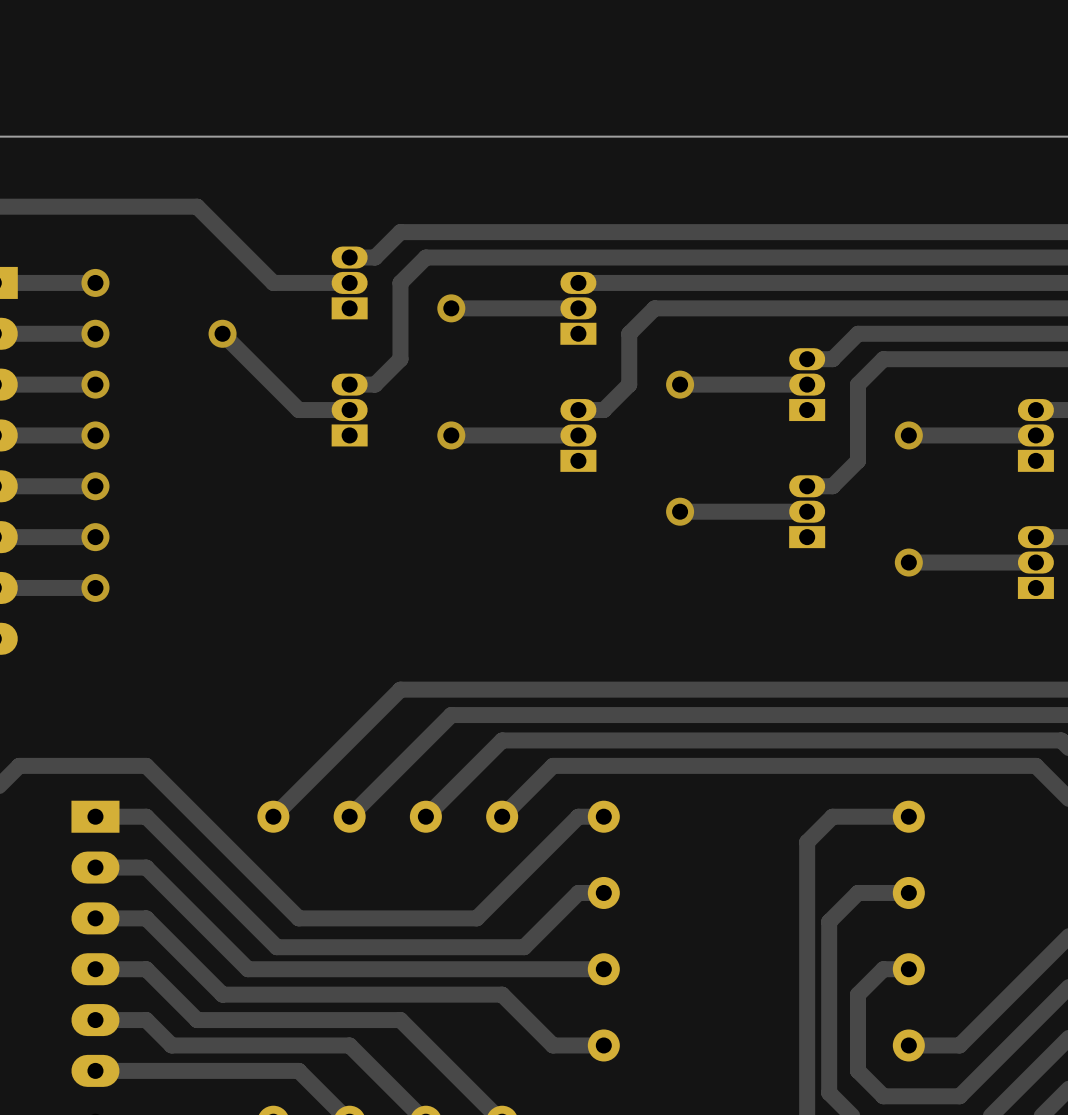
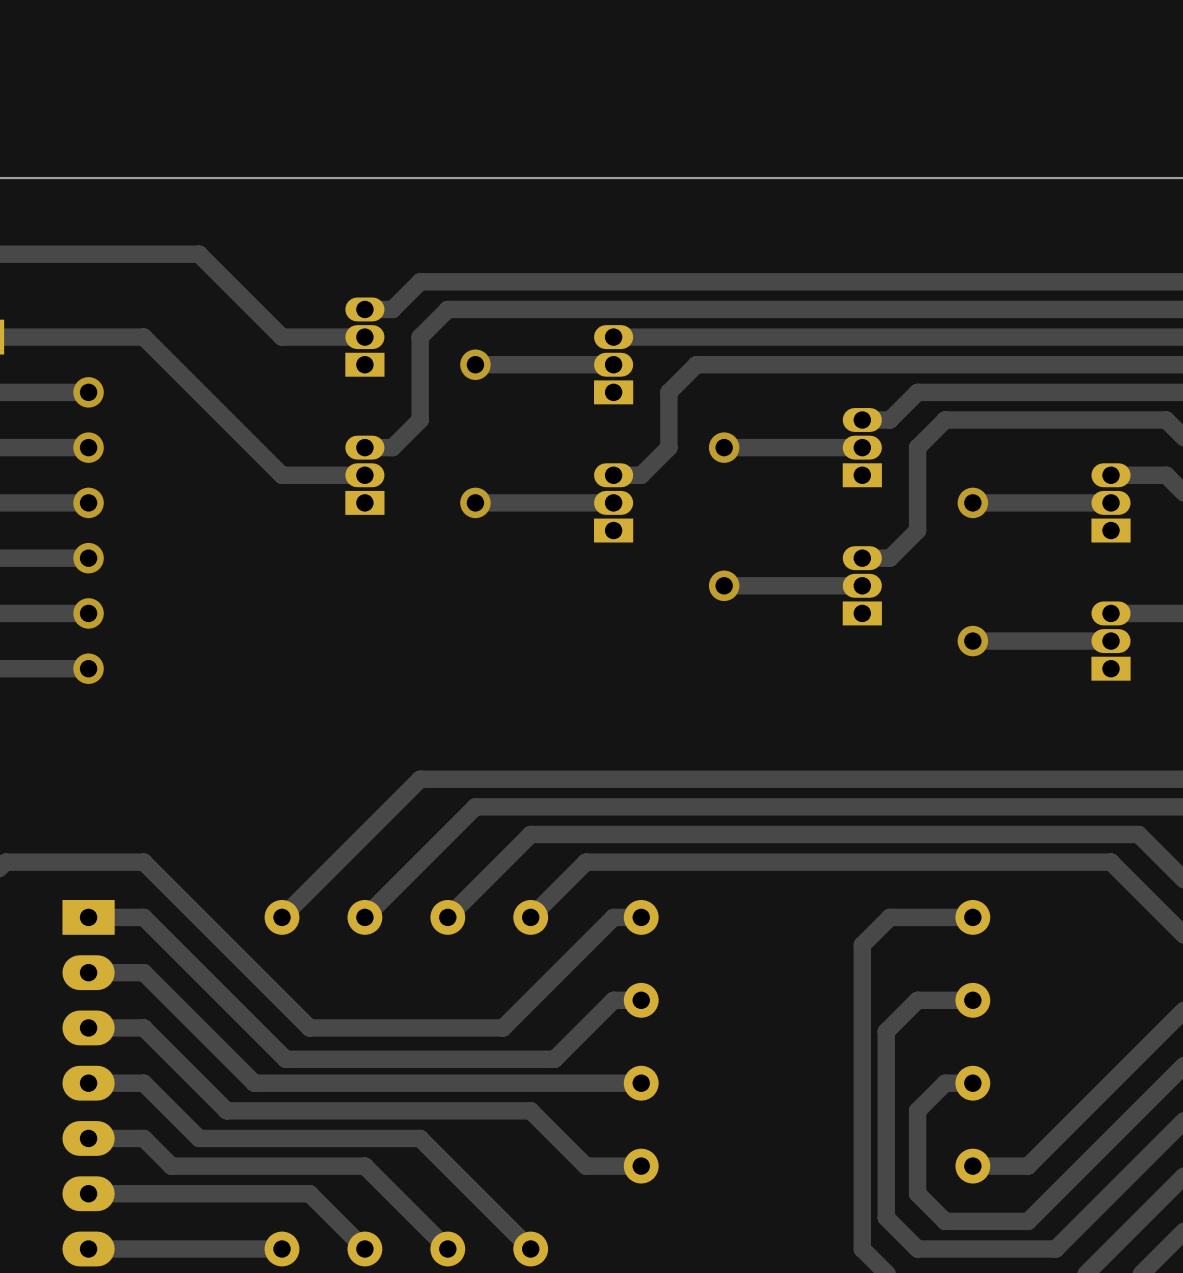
via: (95, 282) -> none
track: (222, 333) (298, 410) -> (88, 337) (143, 337) (282, 475) (309, 475)
via: (222, 333) -> none

